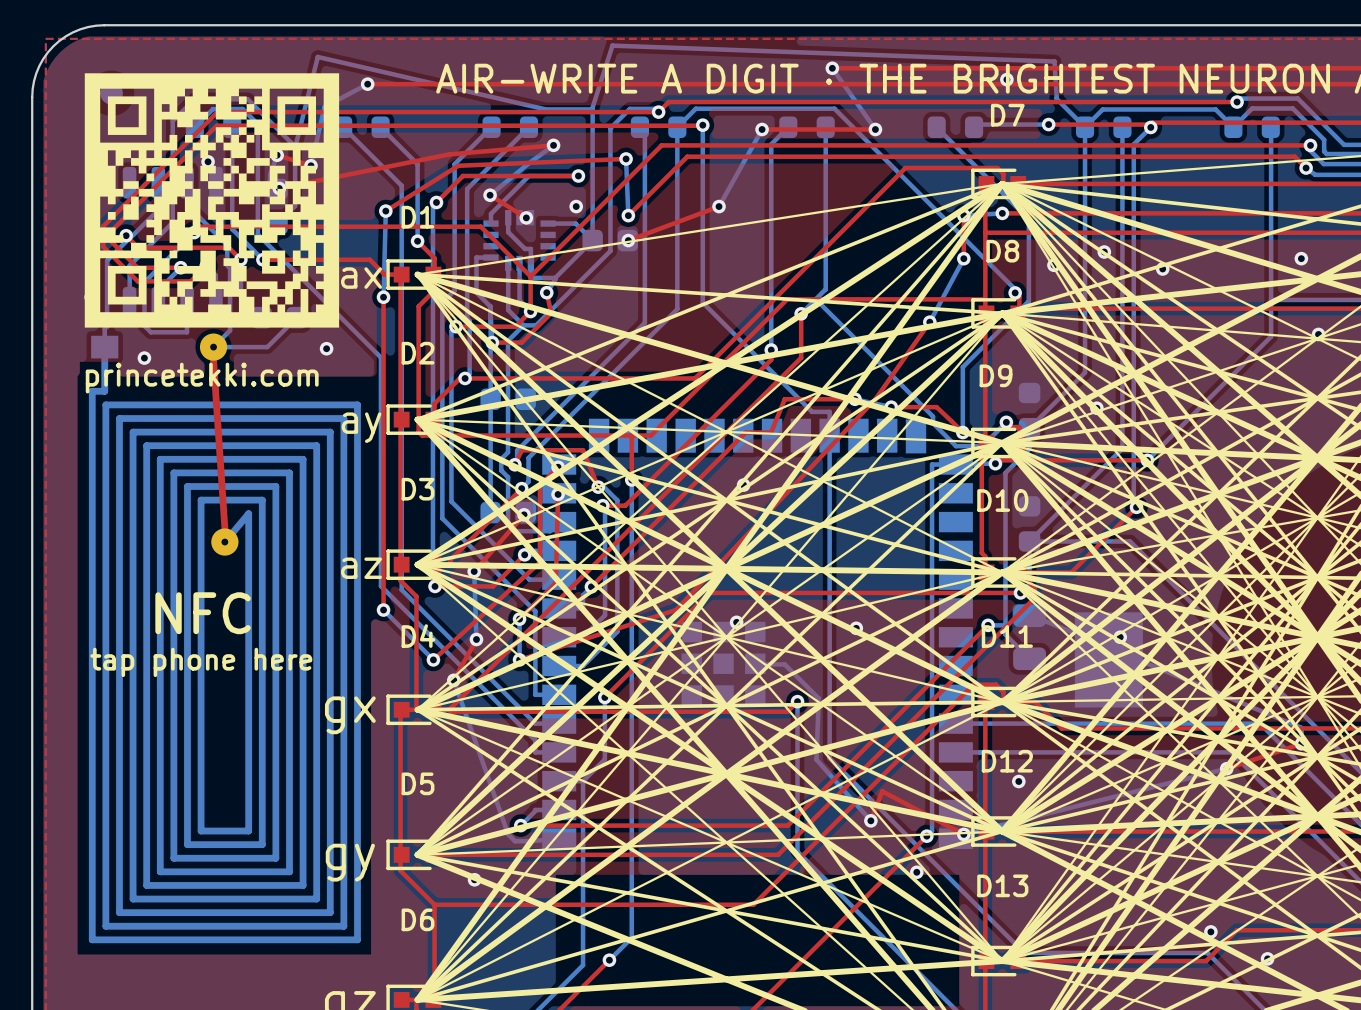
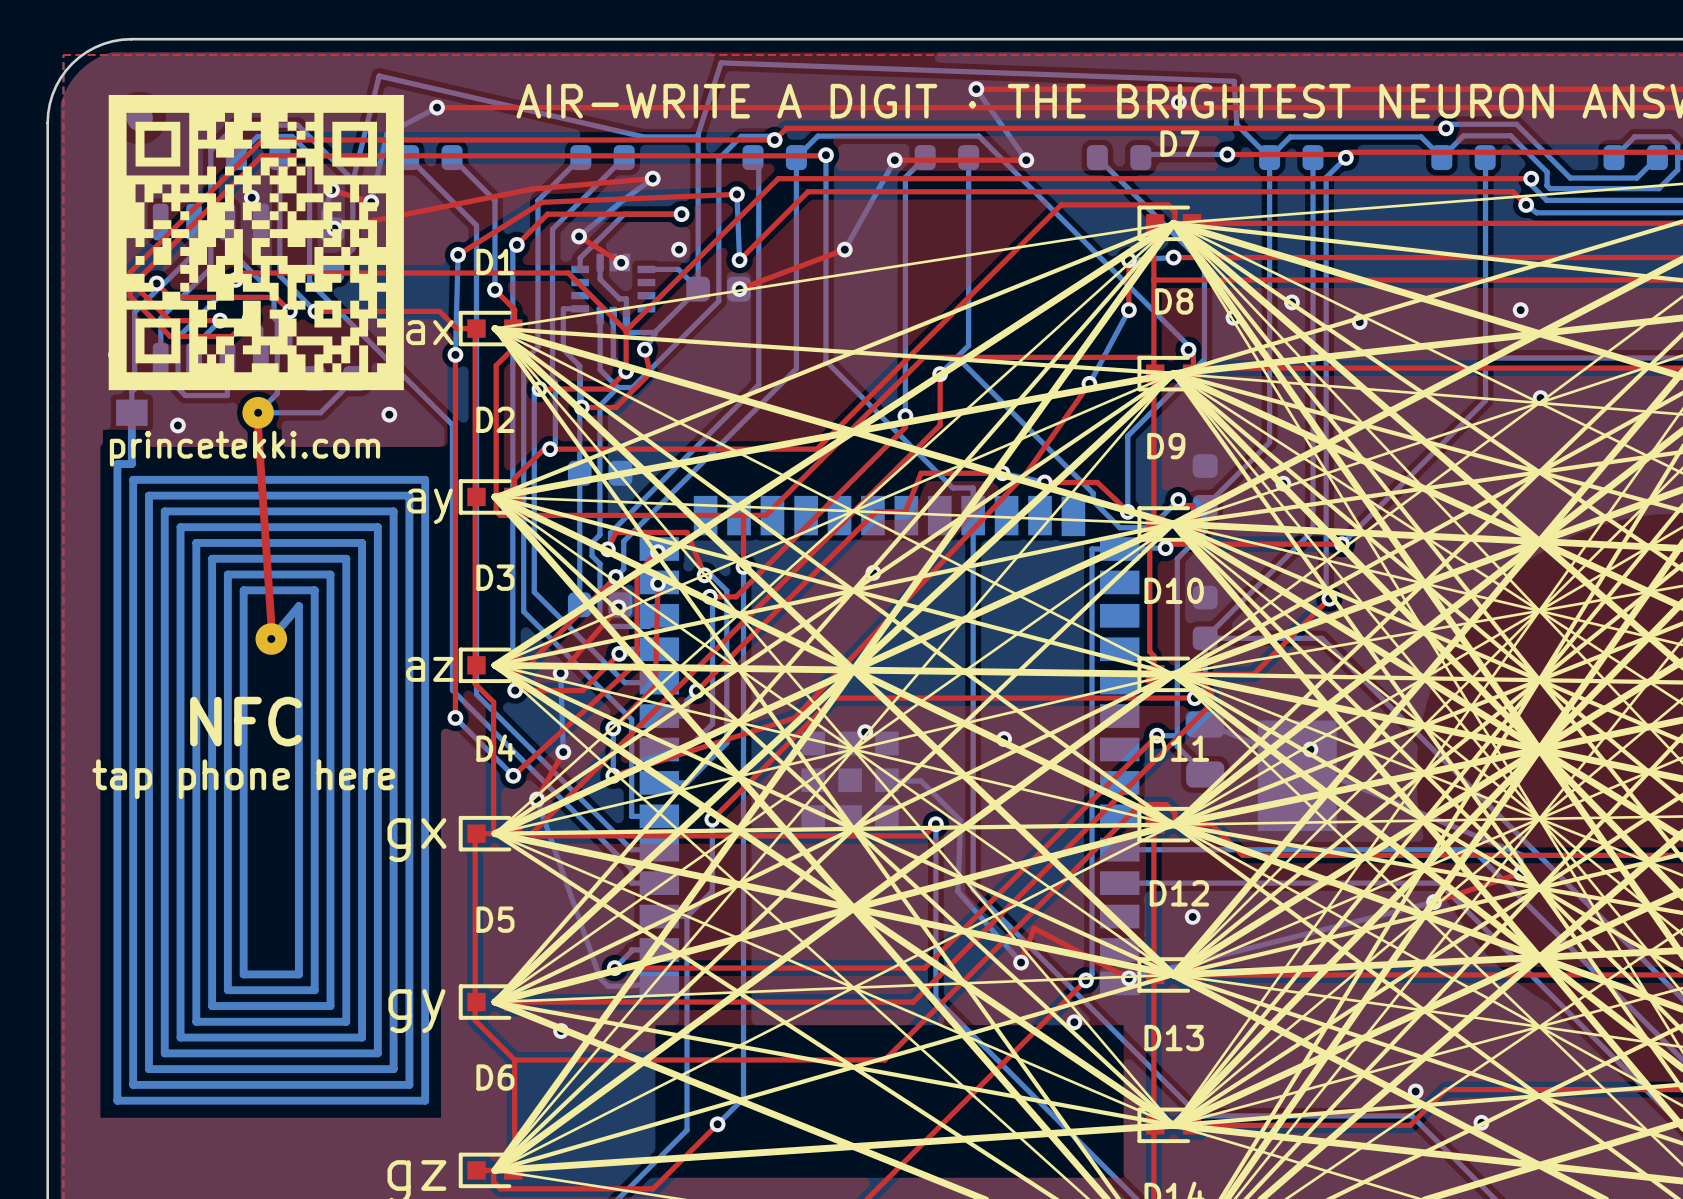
part footprint: [88, 333, 361, 944] -> [113, 396, 430, 1105]

